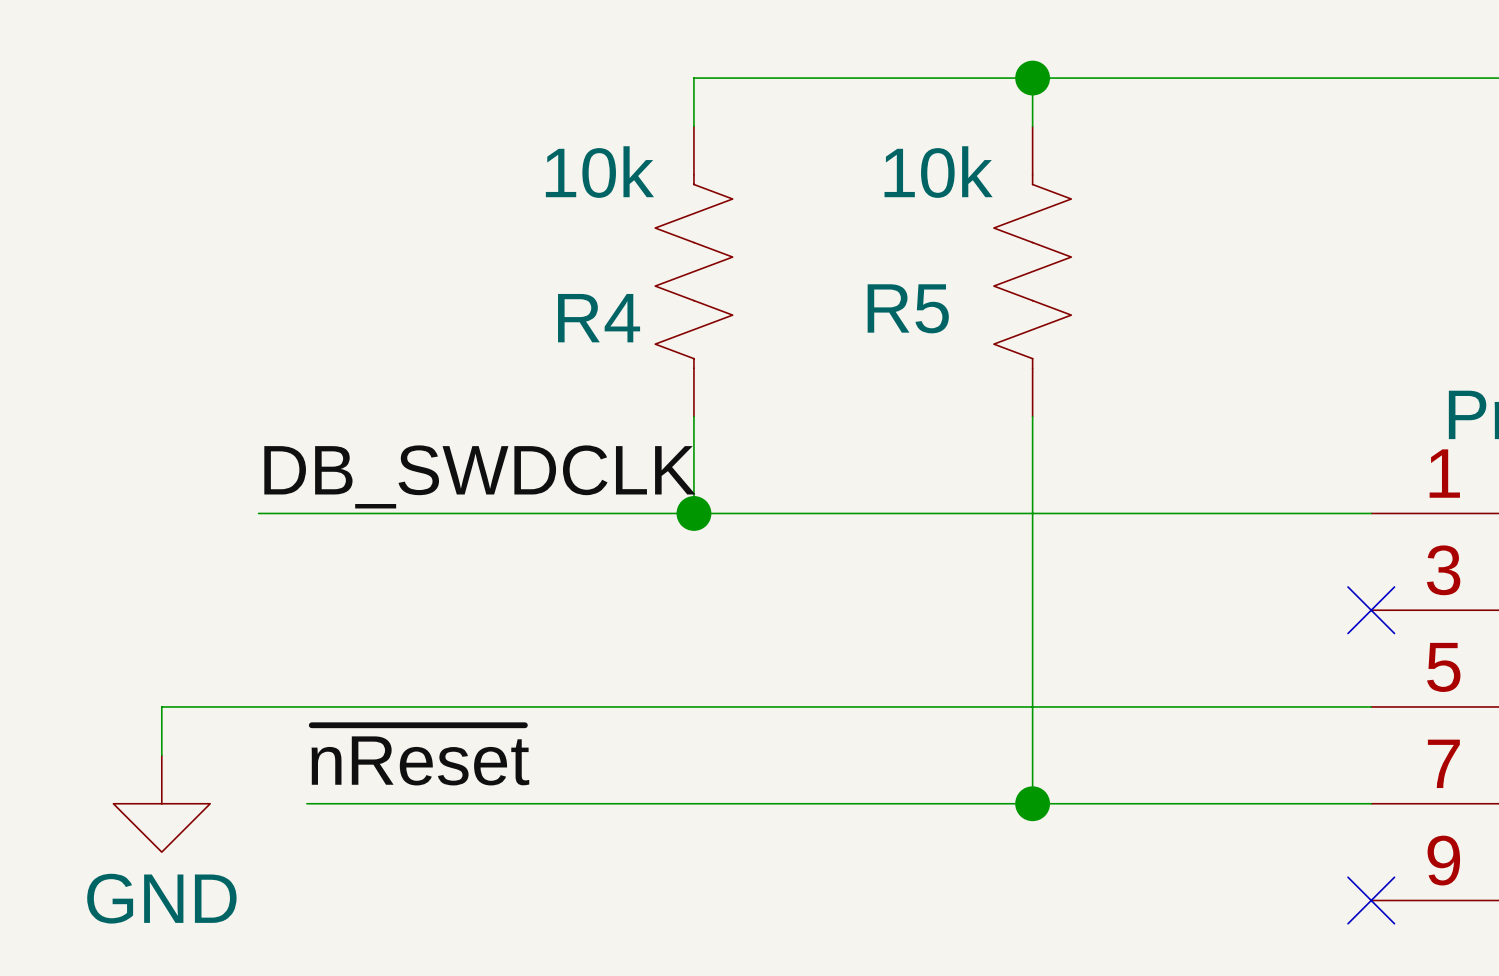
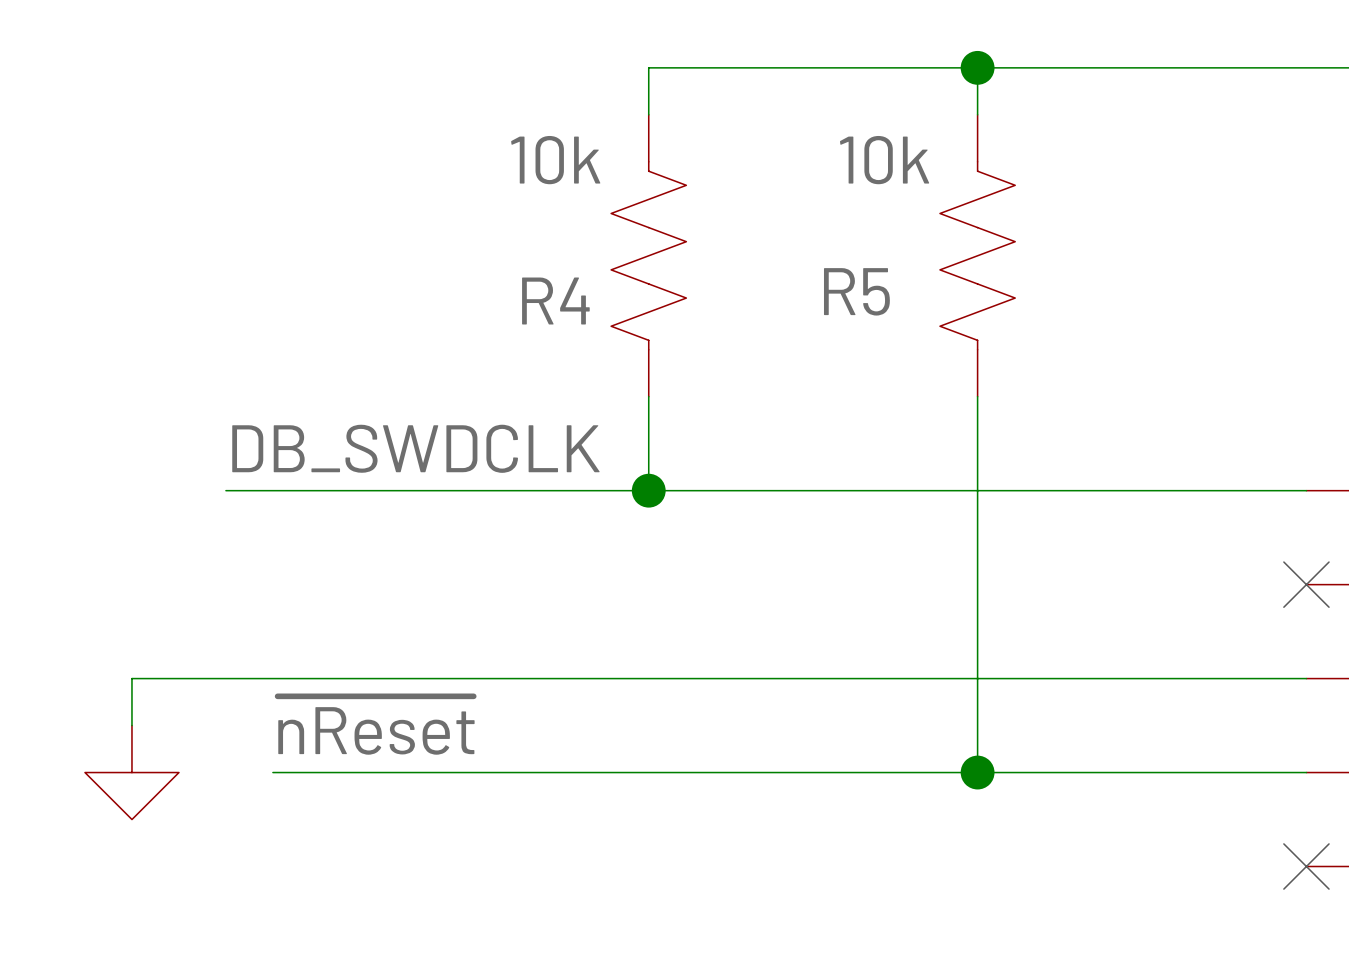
power symbol text: GND (161, 898) -> none

